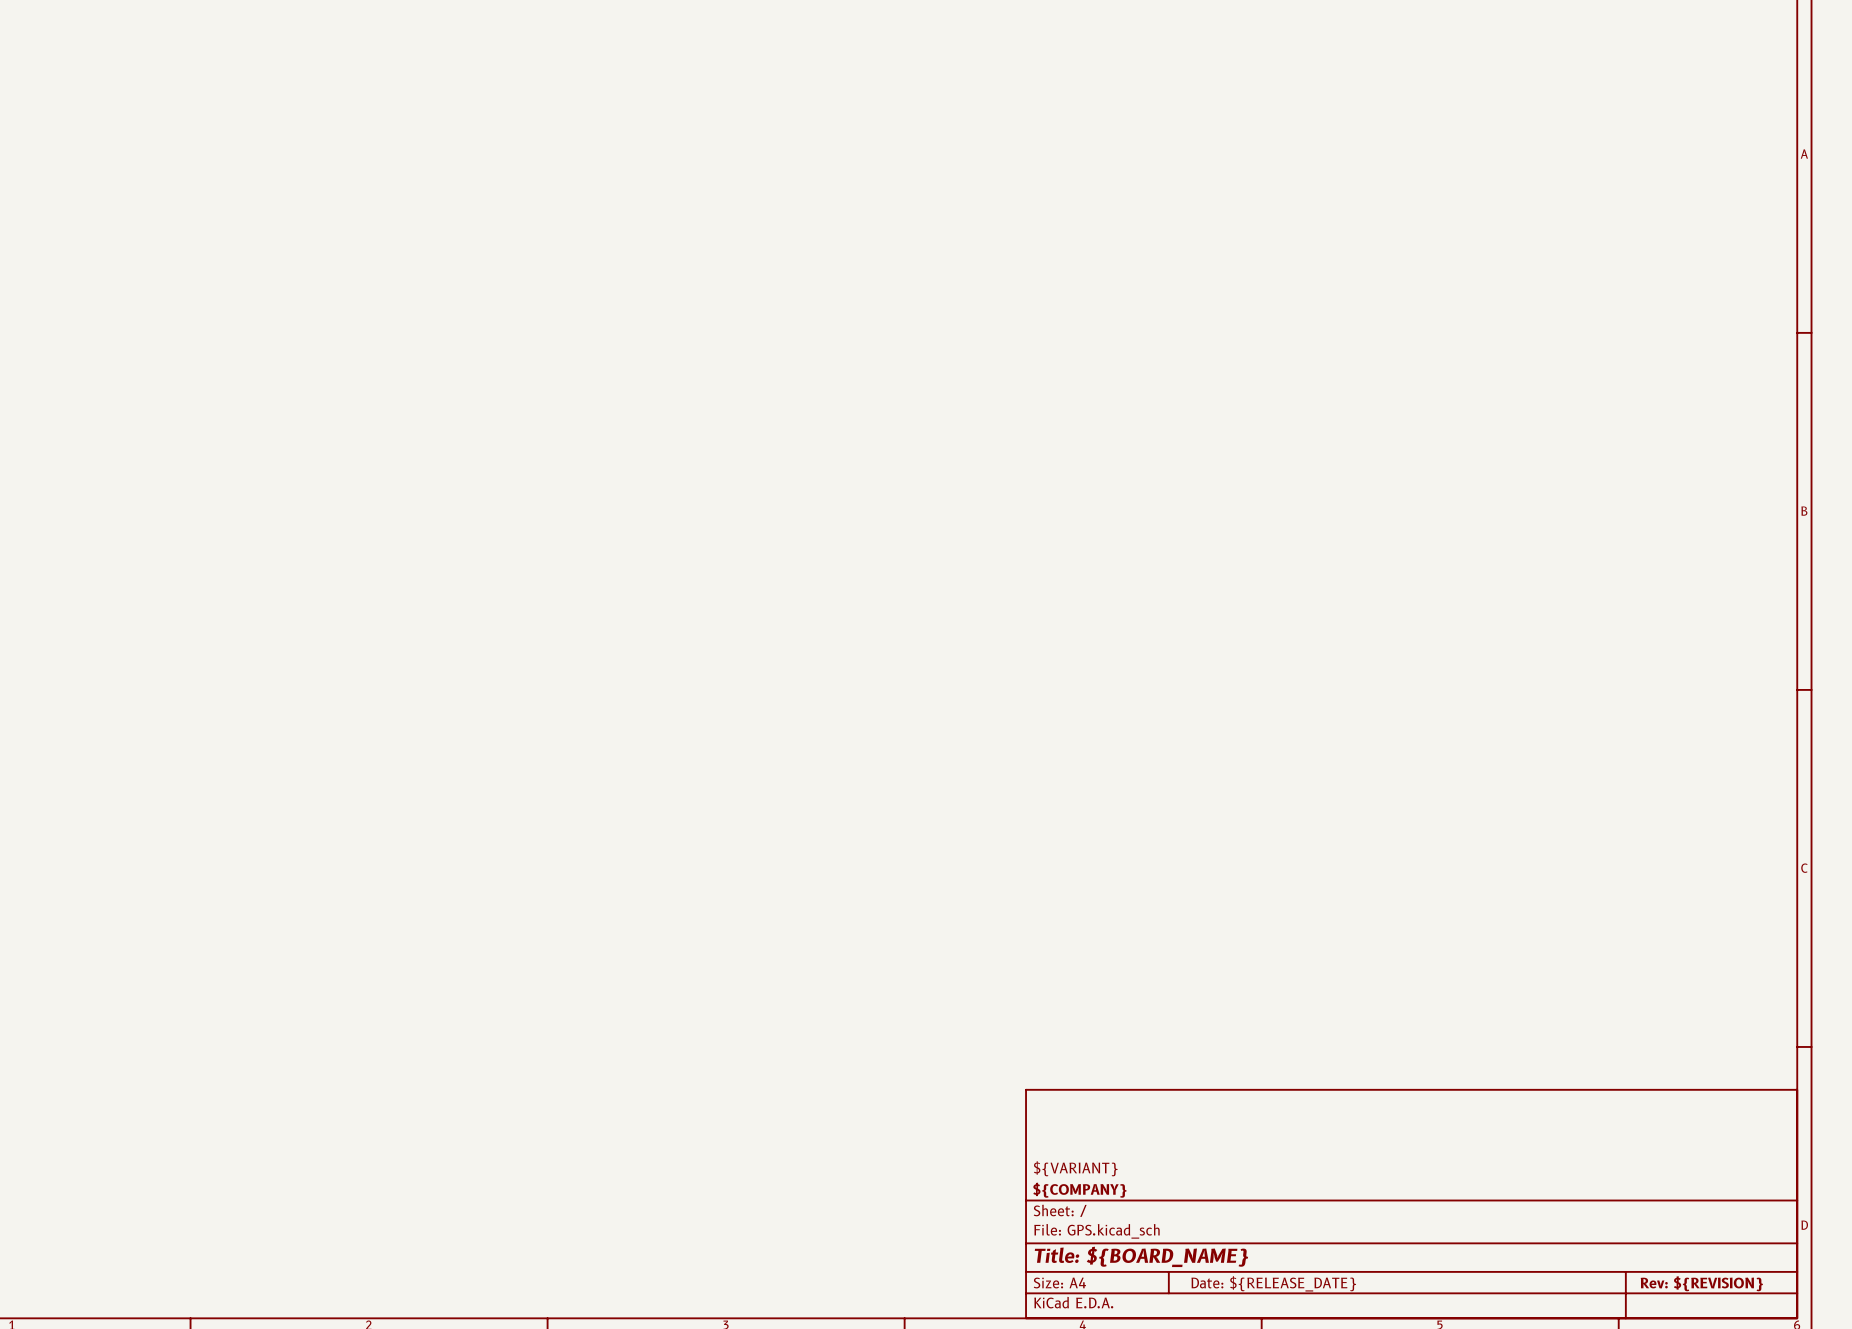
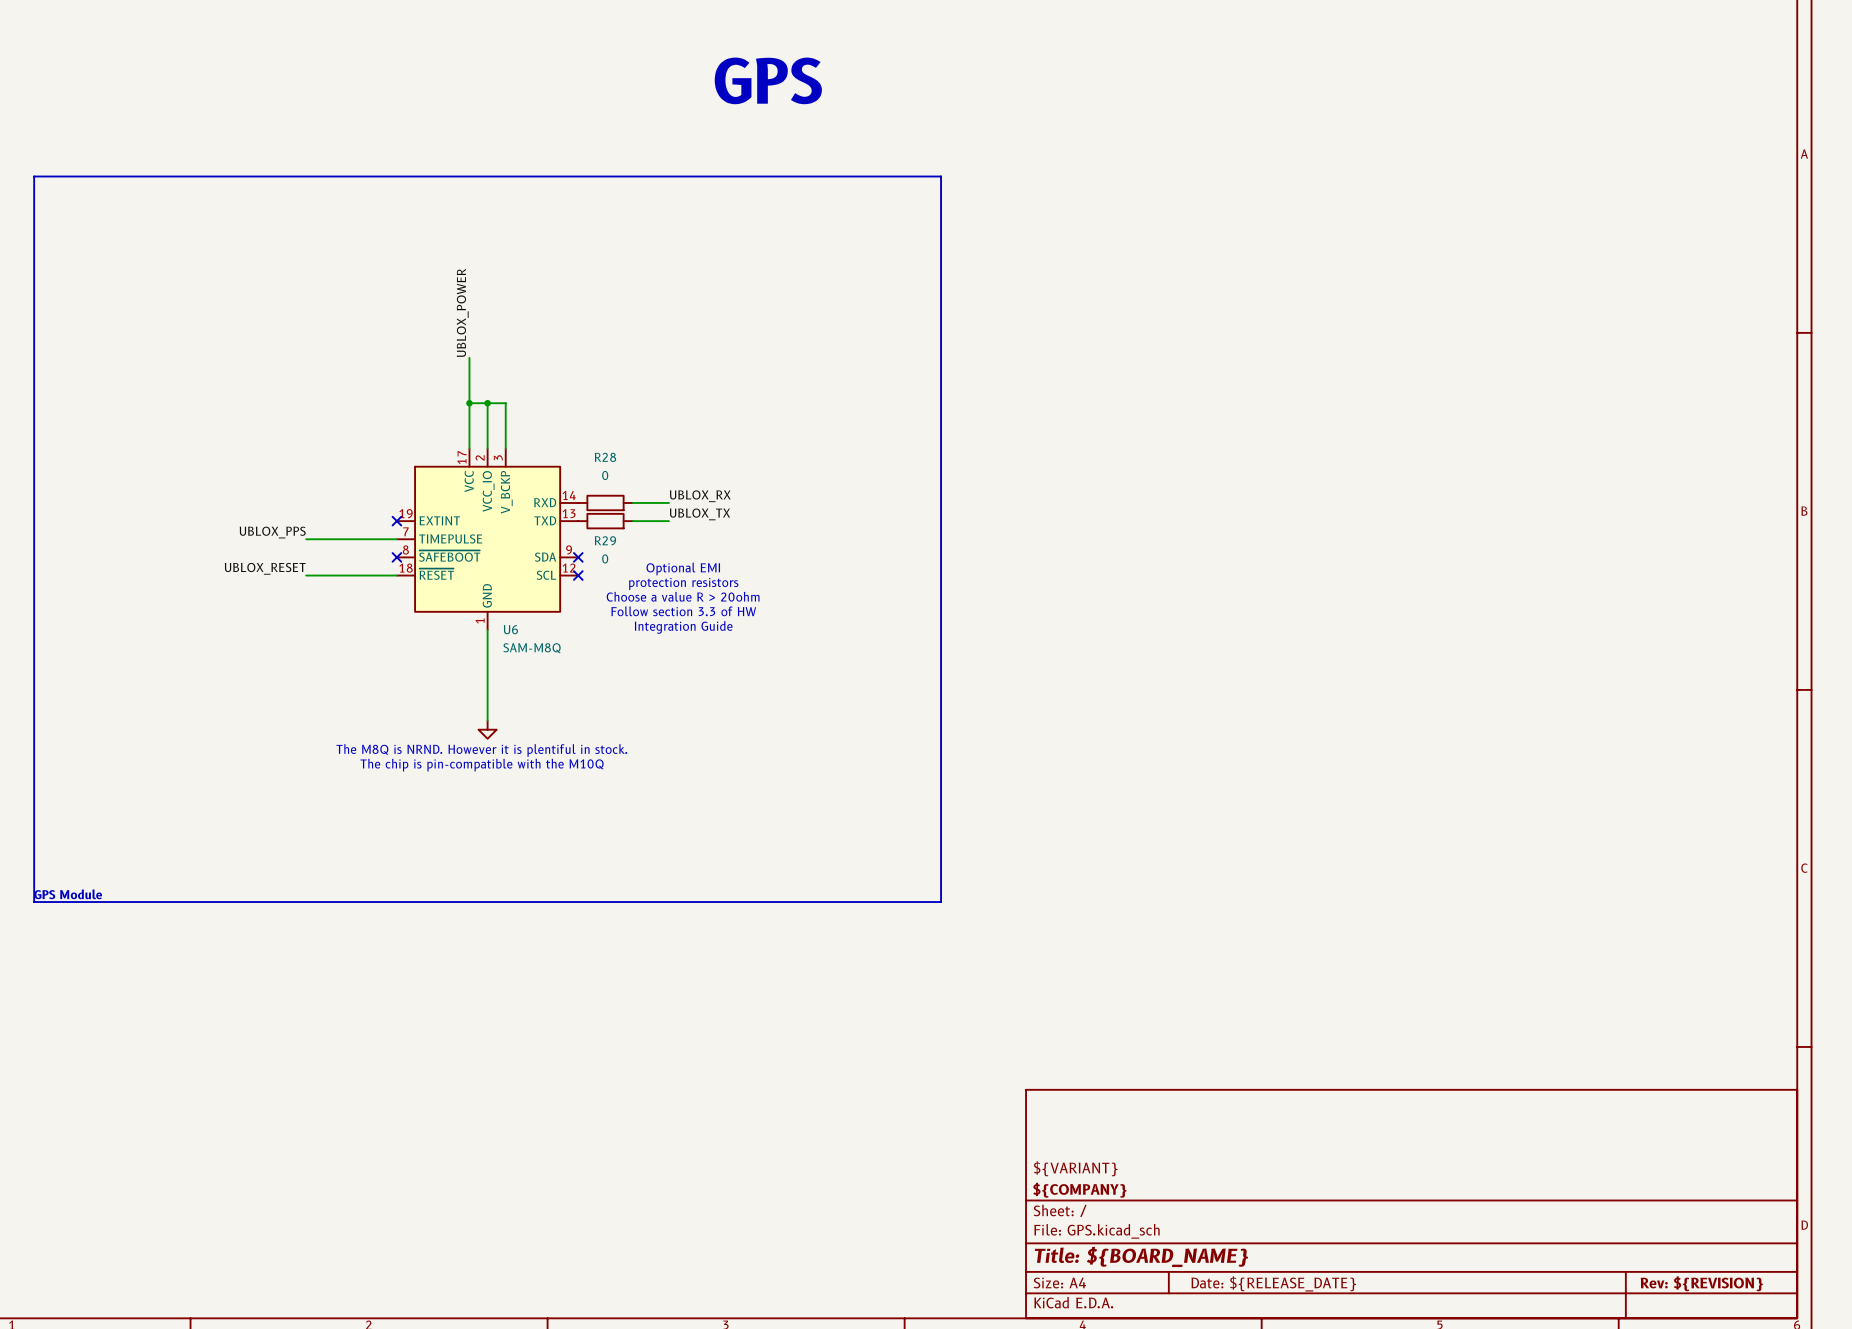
text: none -> GPS (768, 80)
line: none -> (34, 176) (941, 176) (941, 902) (34, 902) (34, 176)
label: none -> UBLOX_POWER (462, 312)
wire: none -> (469, 357) (469, 448)
wire: none -> (469, 403) (505, 403) (505, 448)
junction: none -> (469, 403)
wire: none -> (487, 403) (487, 448)
junction: none -> (487, 403)
label: none -> UBLOX_RX (700, 496)
R28: none -> 0 (605, 502)
wire: none -> (632, 502) (668, 502)
label: none -> UBLOX_TX (699, 514)
no-connect mark: none -> (396, 521)
R29: none -> 0 (605, 521)
wire: none -> (632, 521) (668, 521)
label: none -> UBLOX_PPS (272, 532)
wire: none -> (306, 539) (396, 539)
U6: none -> SAM-M8Q (487, 539)
no-connect mark: none -> (396, 557)
no-connect mark: none -> (578, 557)
label: none -> UBLOX_RESET (265, 568)
text: none -> Optional EMI (683, 568)
wire: none -> (306, 575) (396, 575)
no-connect mark: none -> (578, 575)
text: none -> protection resistors (683, 583)
text: none -> Choose a value R > 20ohm (683, 596)
text: none -> Follow section 3.3 of HW (683, 611)
text: none -> Integration Guide (683, 627)
wire: none -> (487, 629) (487, 720)
power symbol: none -> (487, 729)
text: none -> The M8Q is NRND. However it is plentiful in stock. (481, 750)
text: none -> The chip is pin-compatible with the M10Q (482, 765)
text: none -> GPS Module (68, 894)

